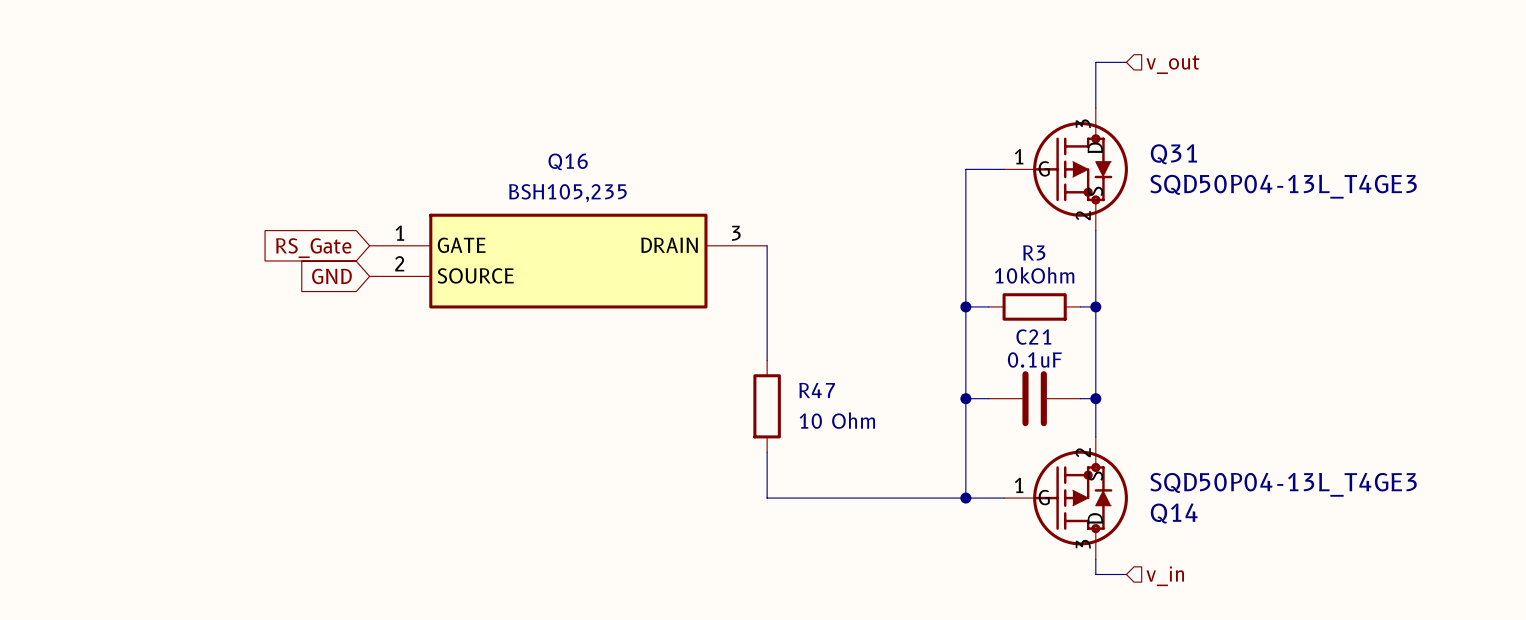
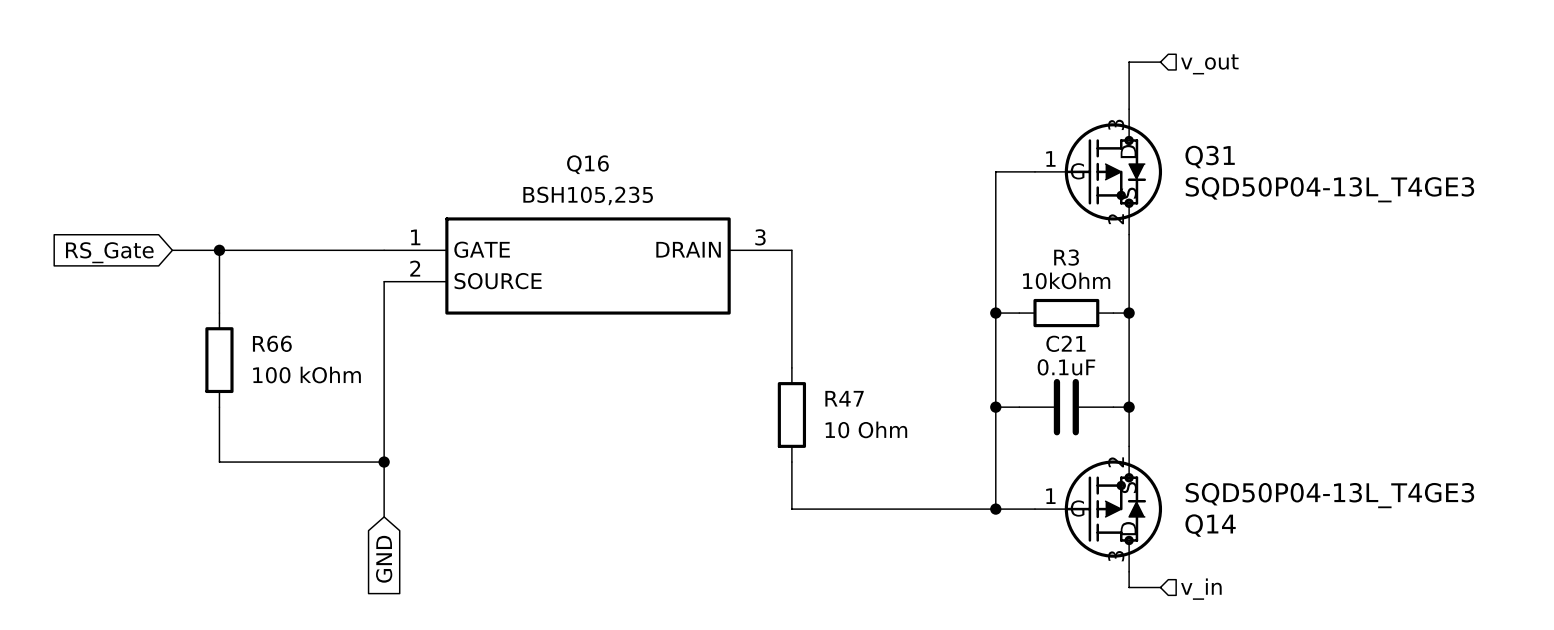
wire: none -> (172, 250) (384, 250)
wire: none -> (219, 250) (219, 313)
junction: none -> (219, 250)
global label position: RS_Gate (313, 248) -> RS_Gate (109, 252)
global label rotation: 0° (331, 276) -> 90° counterclockwise (384, 559)
global label position: GND (331, 276) -> GND (384, 559)
wire: none -> (384, 281) (384, 516)
R66: none -> 100 kOhm (219, 360)
wire: none -> (219, 407) (219, 462) (384, 462)
junction: none -> (384, 462)

